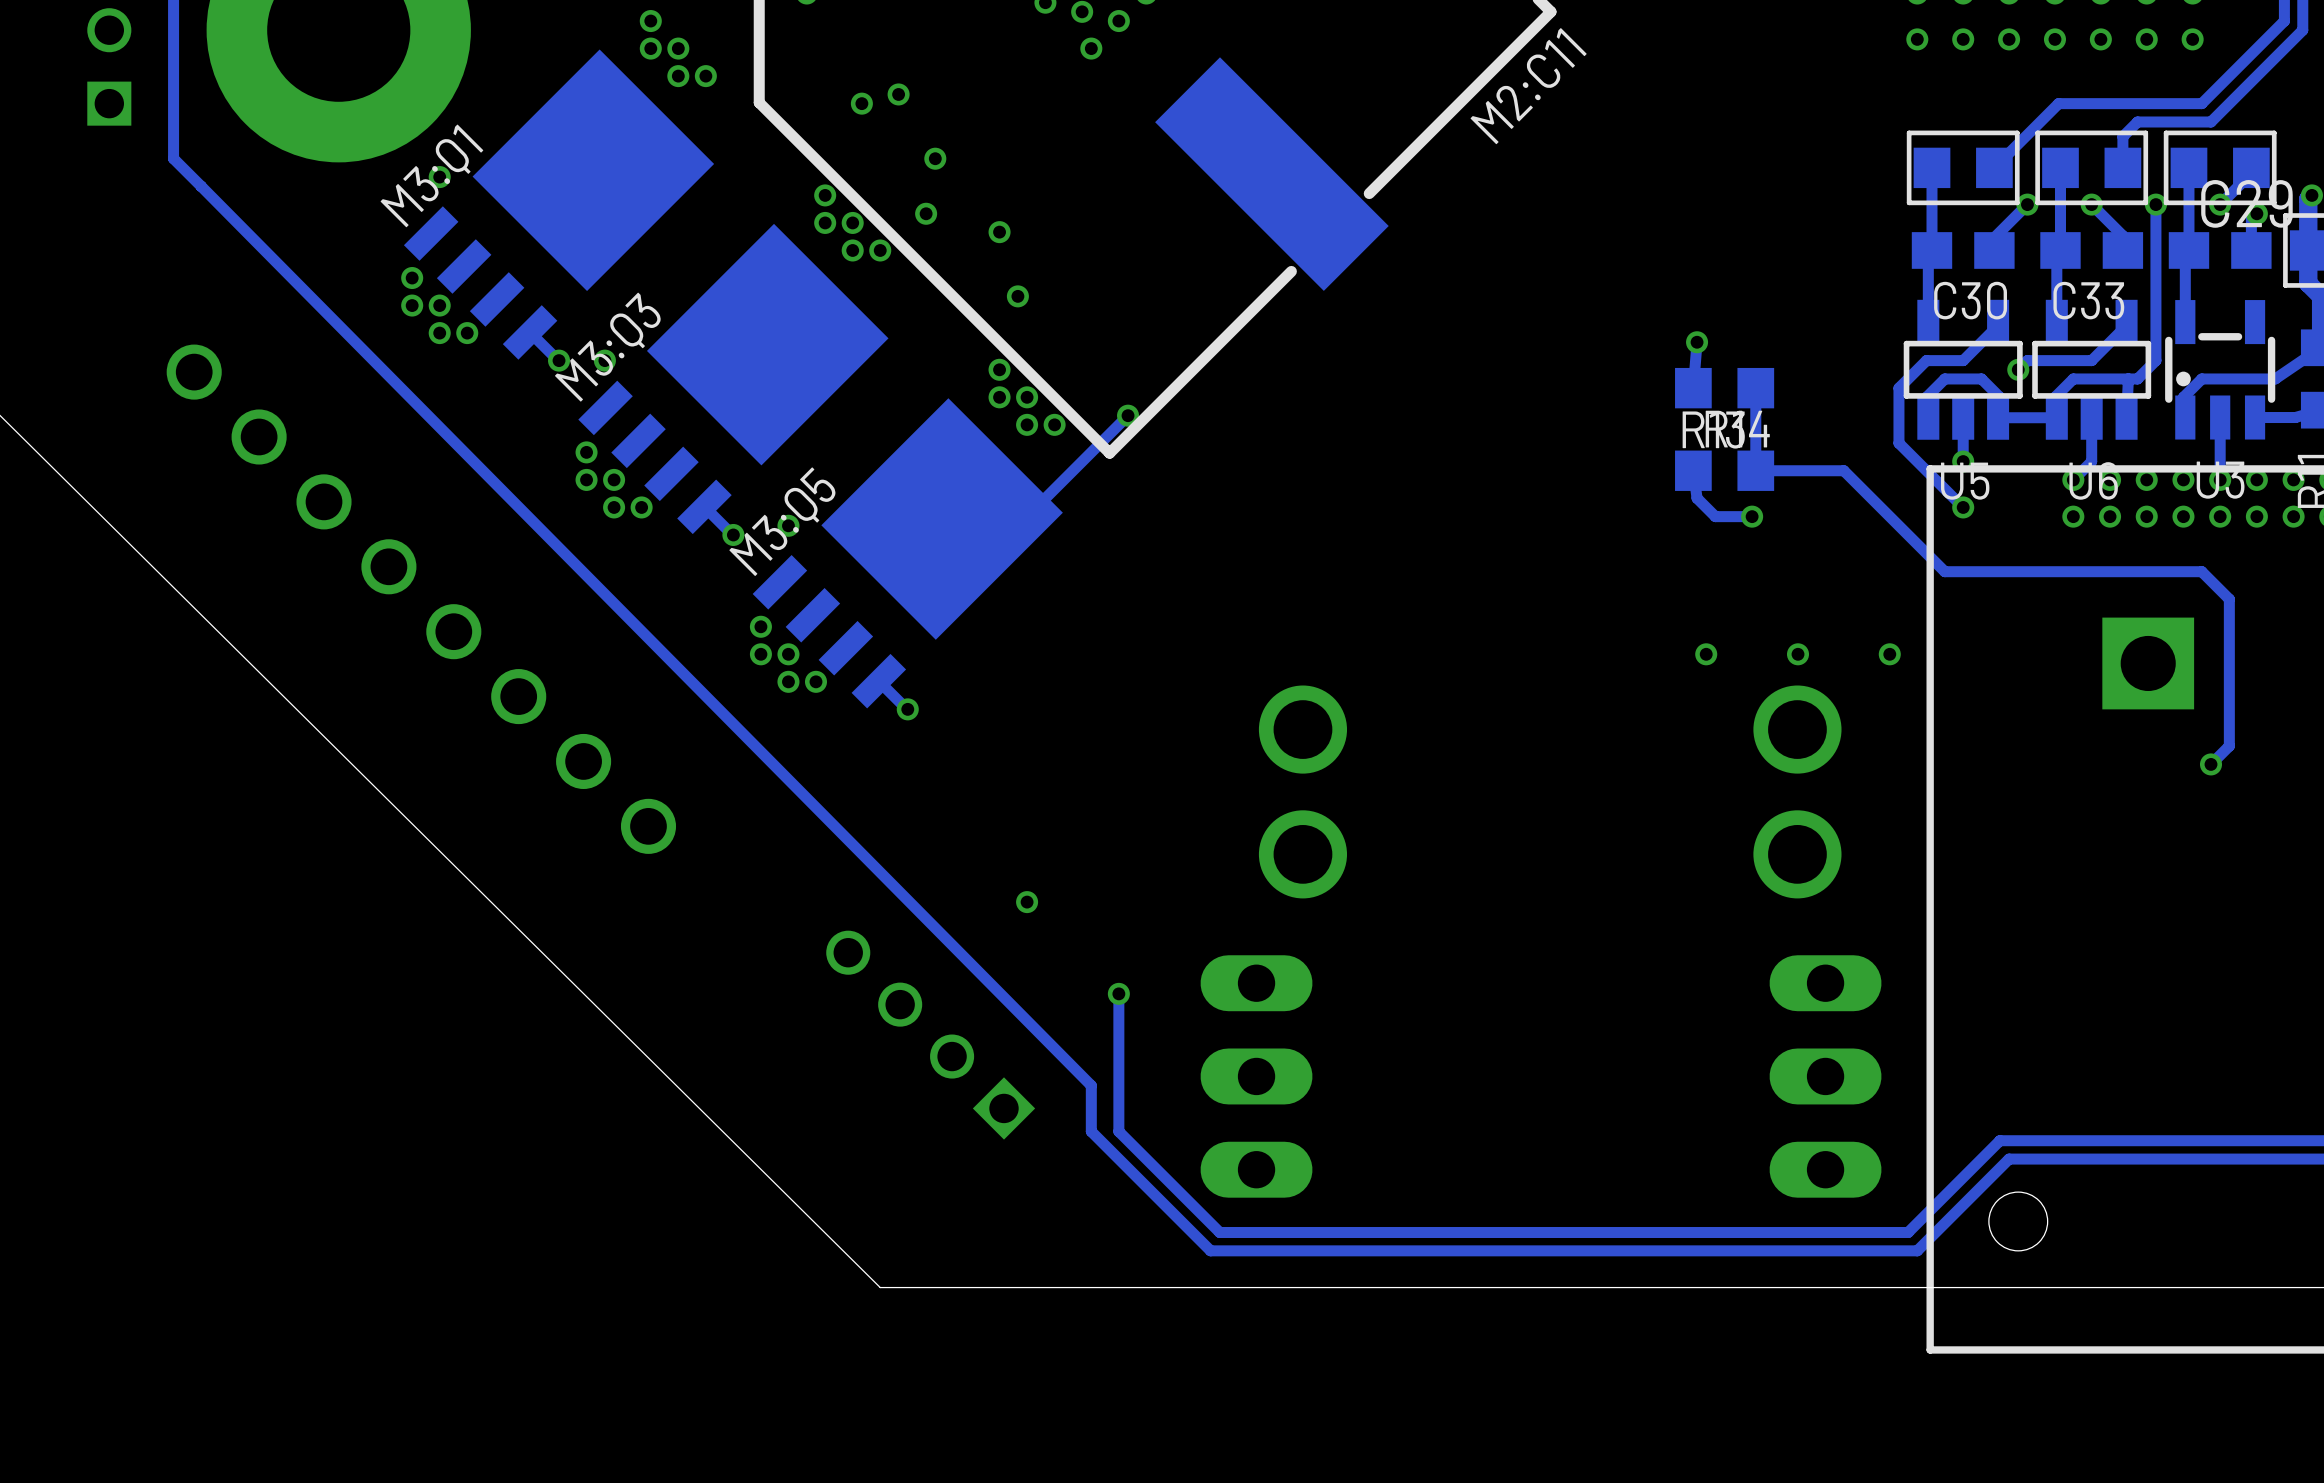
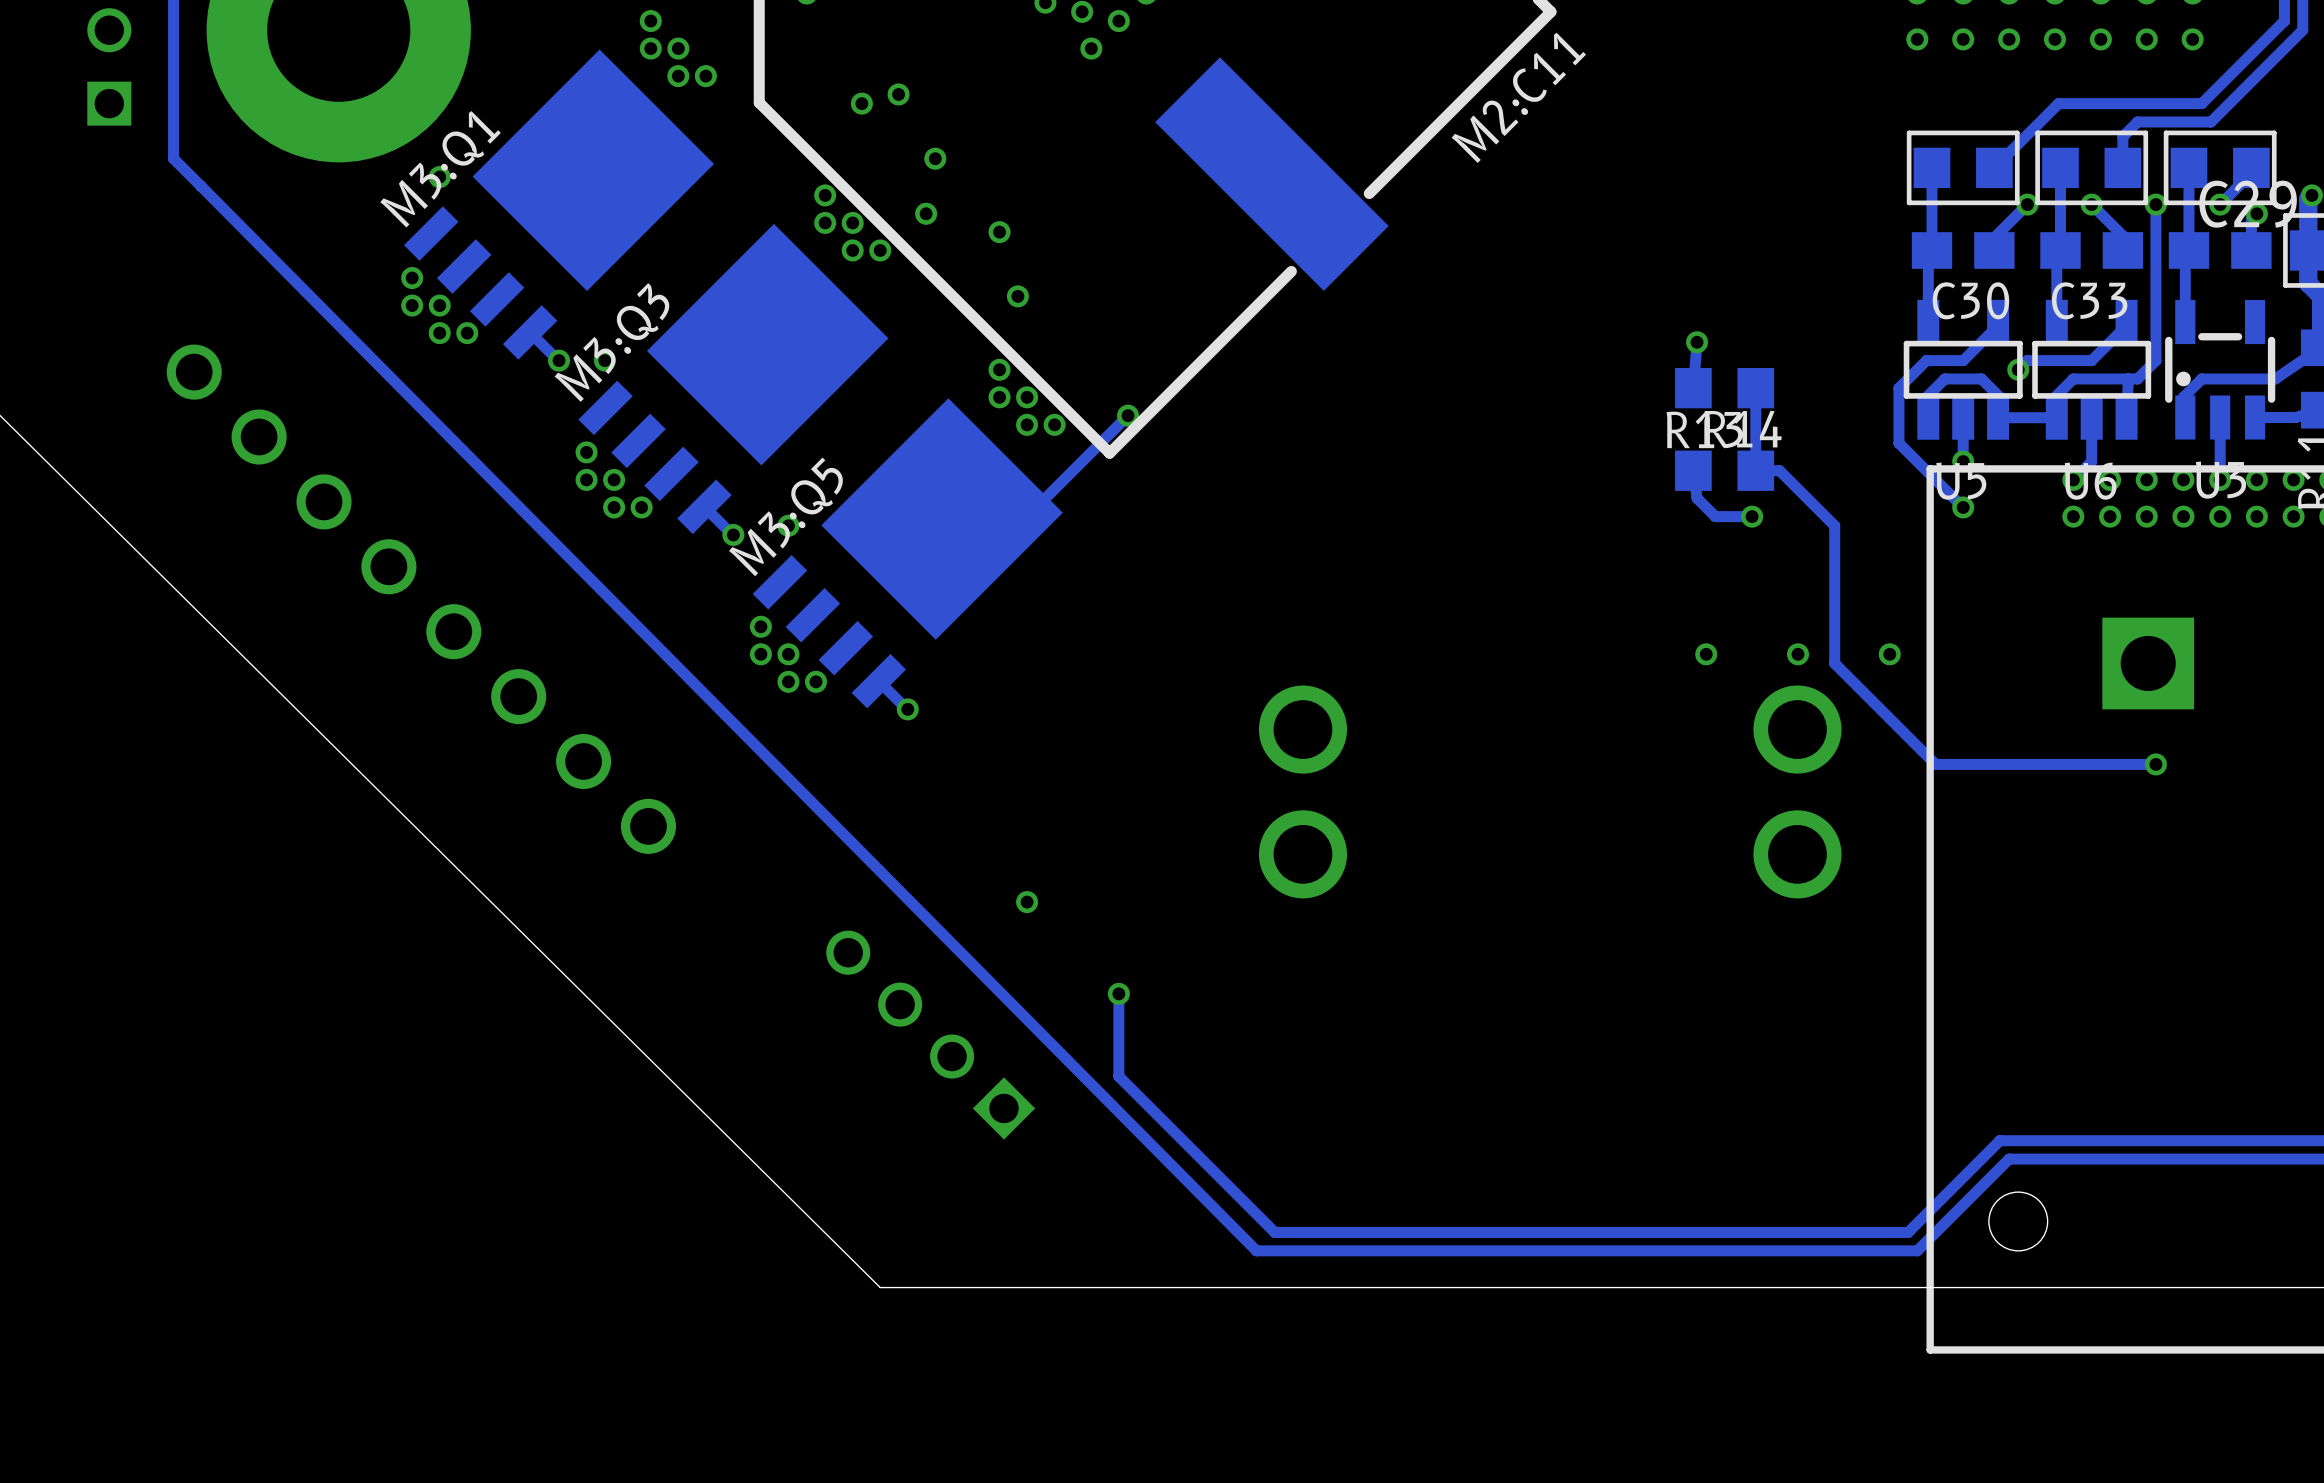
track: (201, 186) (1091, 1085) (1091, 1131) (1210, 1250) (1256, 1250) -> (201, 186) (1256, 1250)
track: (1779, 470) (1843, 470) (1944, 571) (2201, 571) (2229, 599) (2229, 746) (2211, 764) -> (1779, 470) (1834, 525) (1834, 663) (1935, 764) (2155, 764)
via position: (2211, 764) -> (2155, 764)
track: (1118, 1076) (1118, 1131) (1219, 1232) (1274, 1232) -> (1118, 1076) (1274, 1232)
part: (1256, 1076) -> none
part: (1825, 1076) -> none

